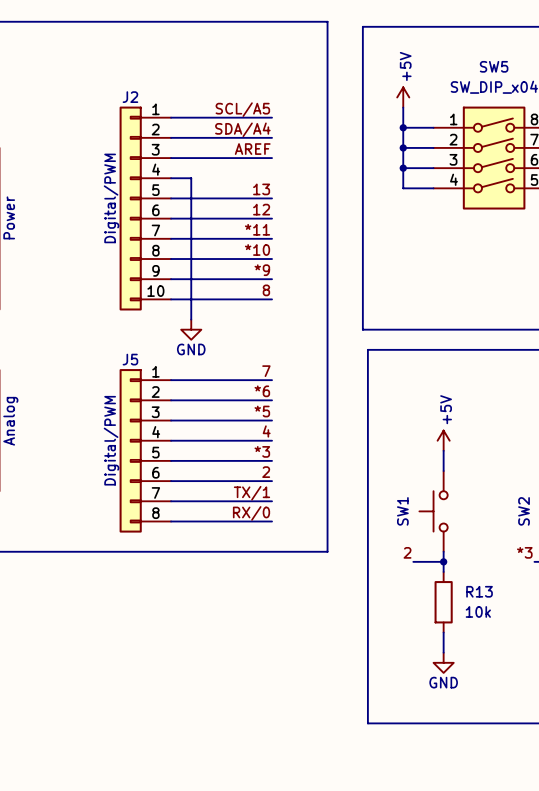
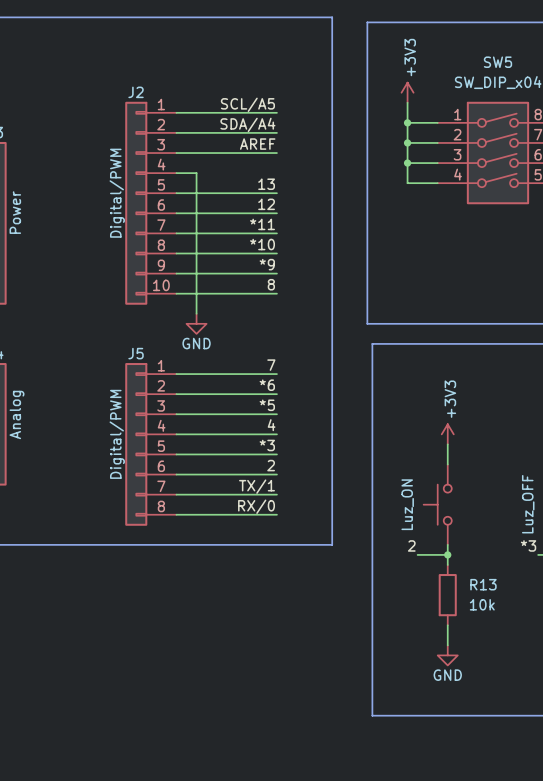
power symbol: +5V (403, 97) -> +3V3 (407, 92)
power symbol: +5V (443, 440) -> +3V3 (447, 434)
SW1 name: SW1 (402, 511) -> Luz_ON (407, 504)
SW2 name: SW2 (524, 511) -> Luz_OFF (528, 504)

